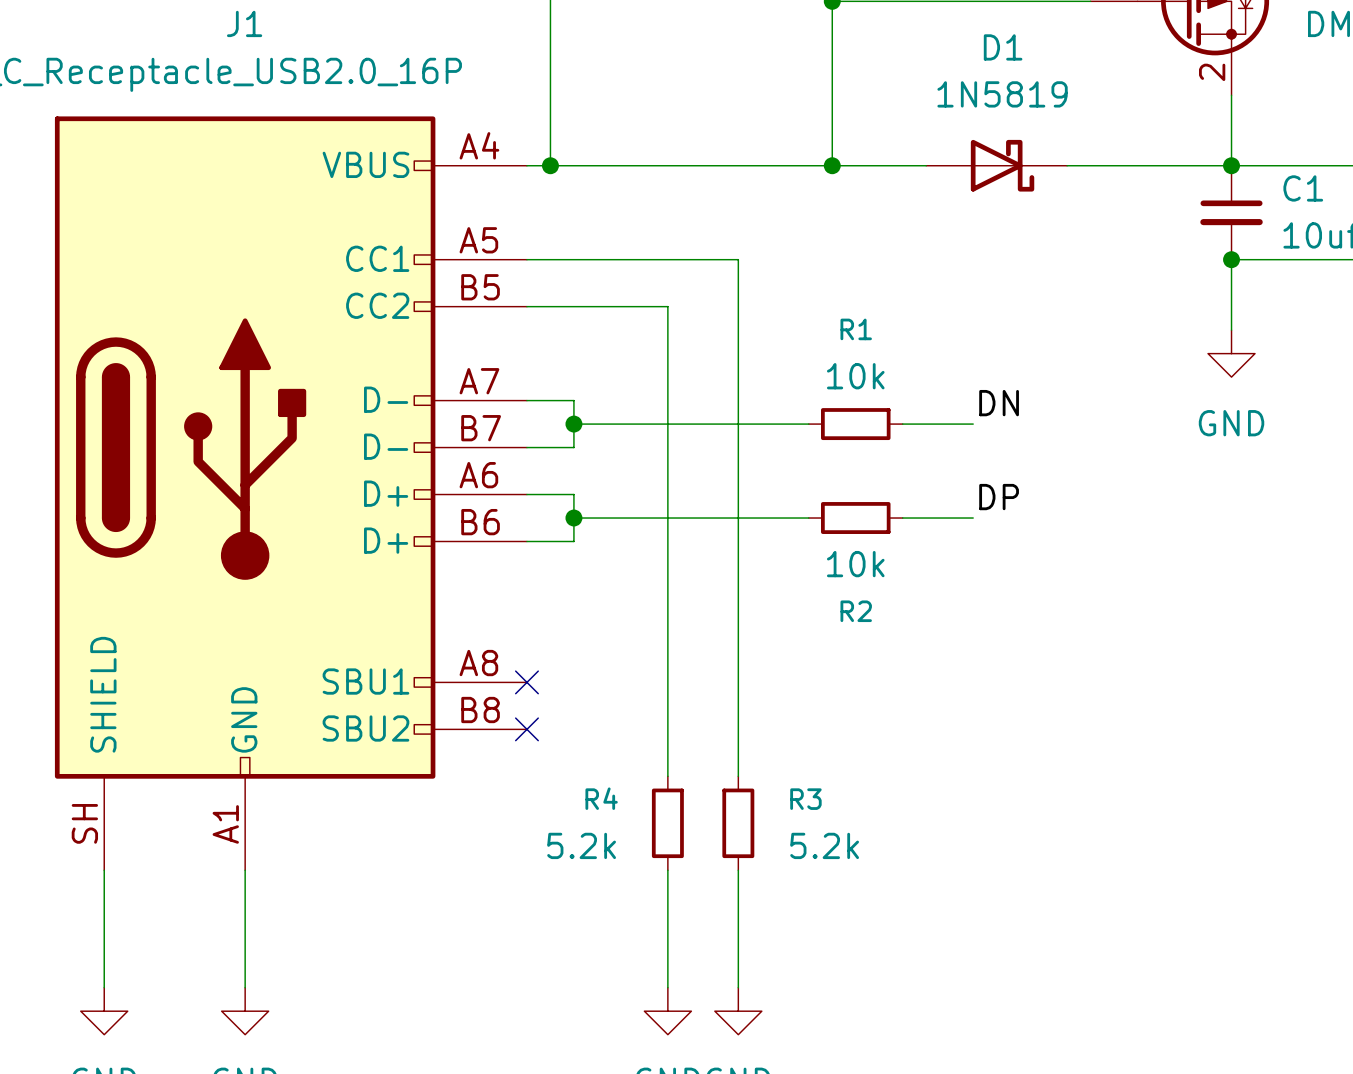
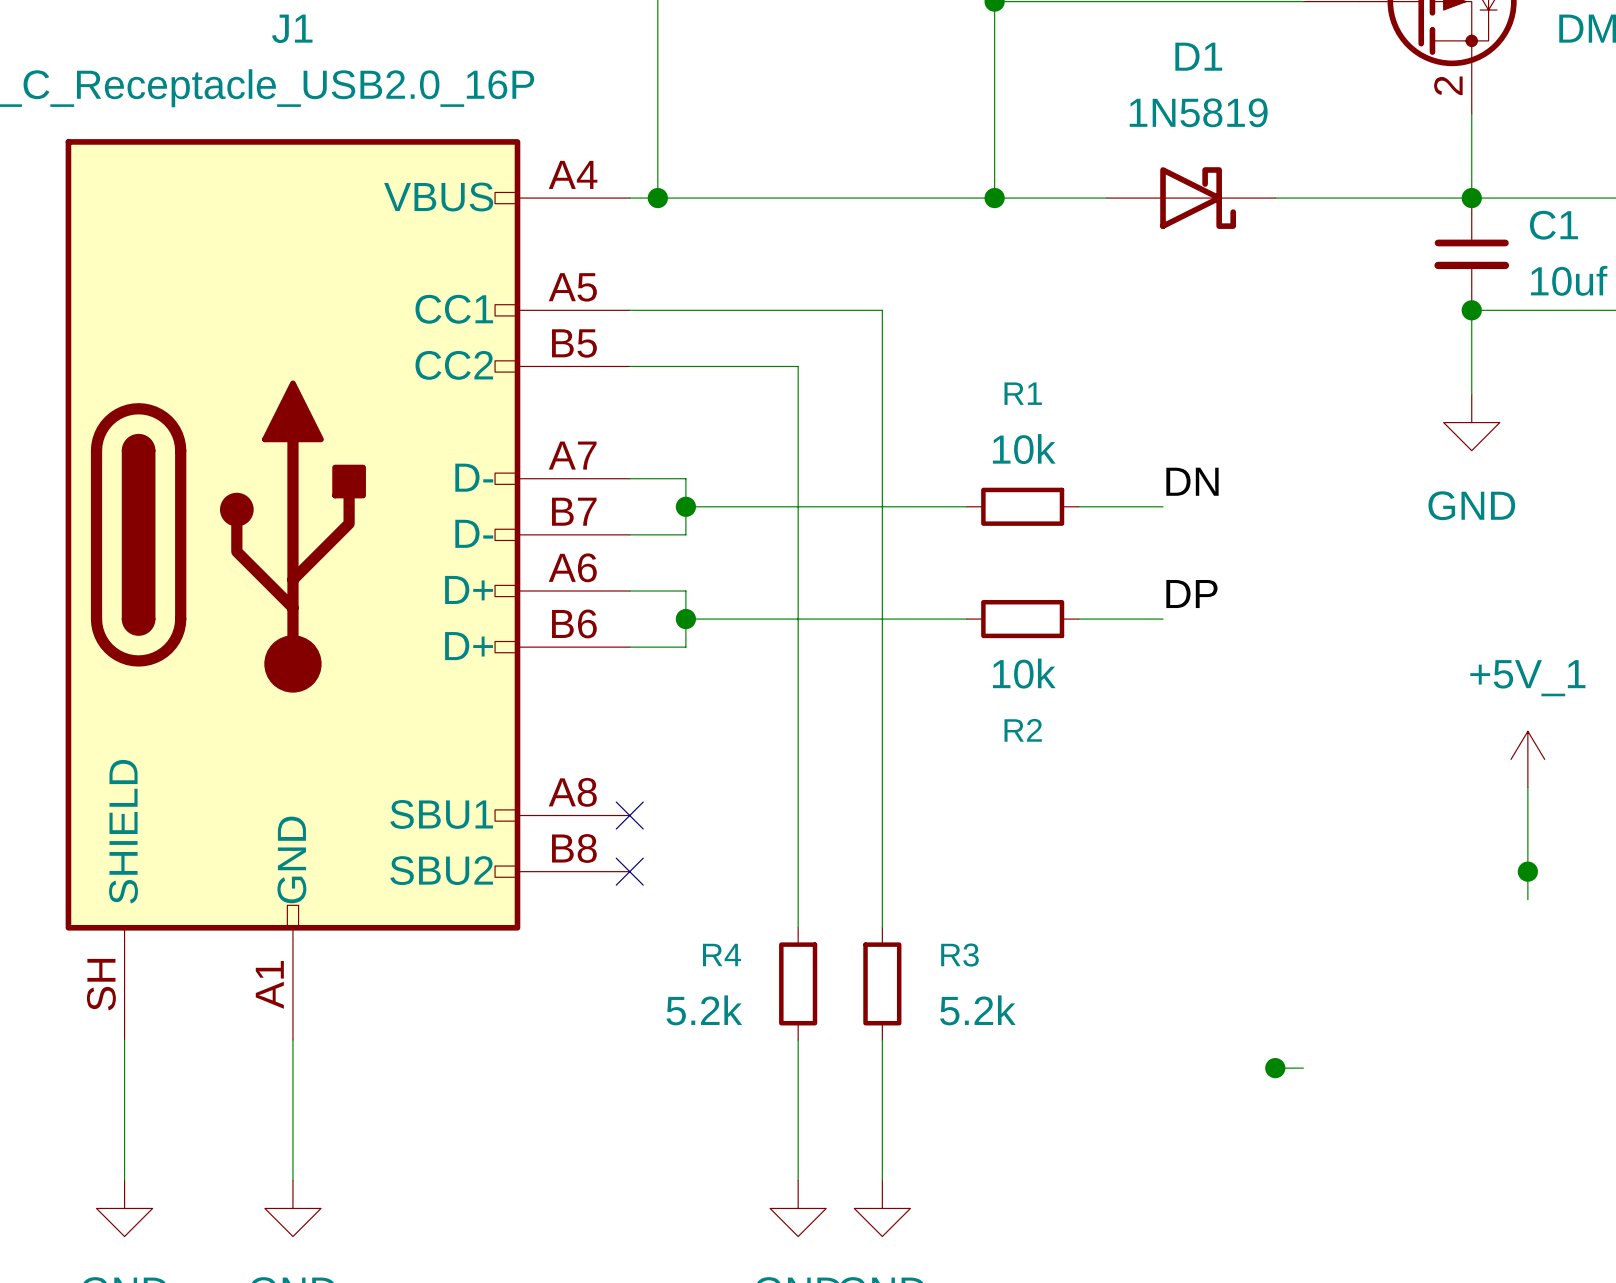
power symbol: none -> +5V_1 (1527, 759)
wire: none -> (1527, 787) (1527, 899)
junction: none -> (1527, 871)
wire: none -> (1275, 1068) (1303, 1068)
junction: none -> (1275, 1068)

